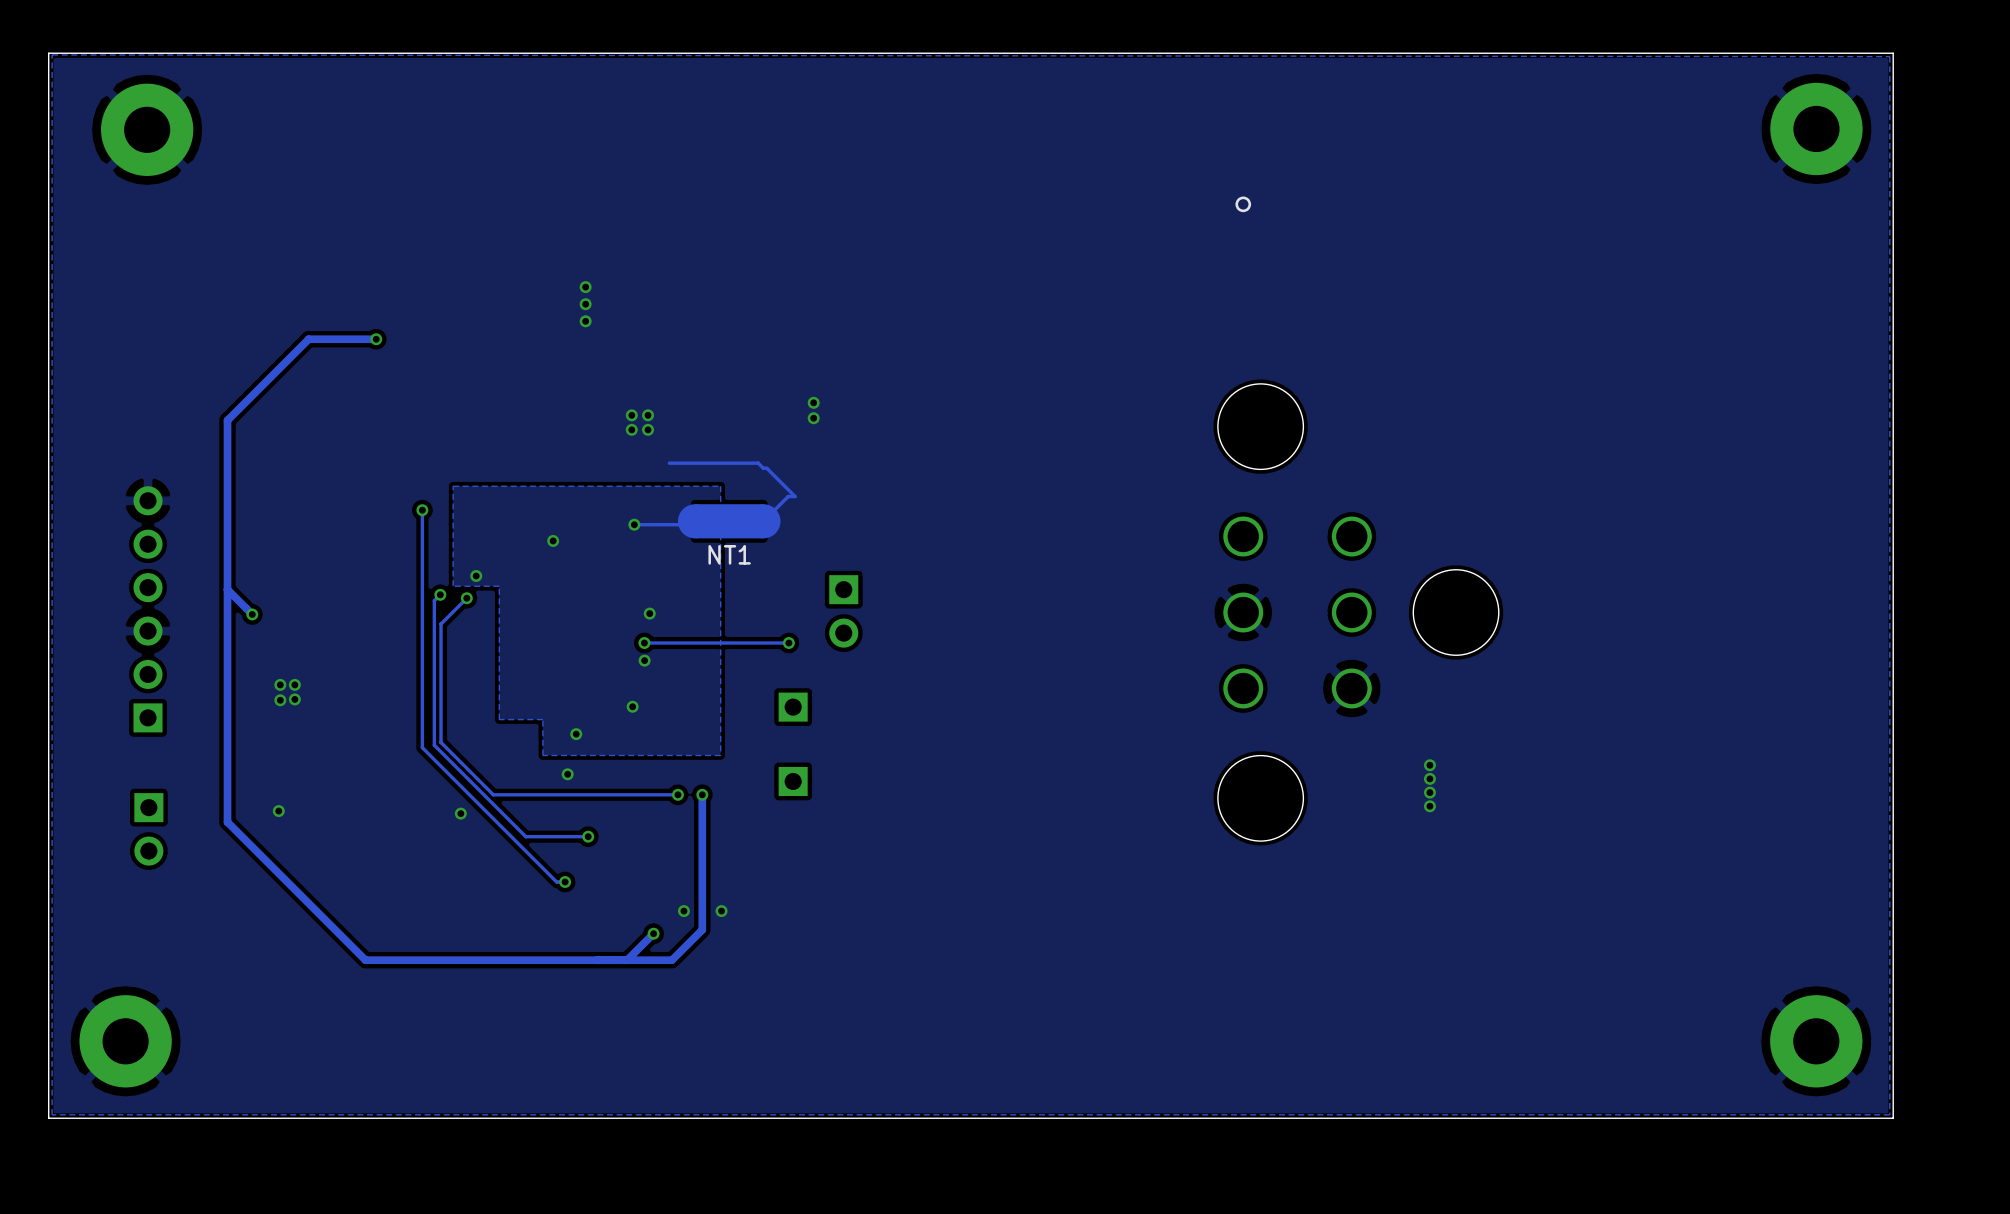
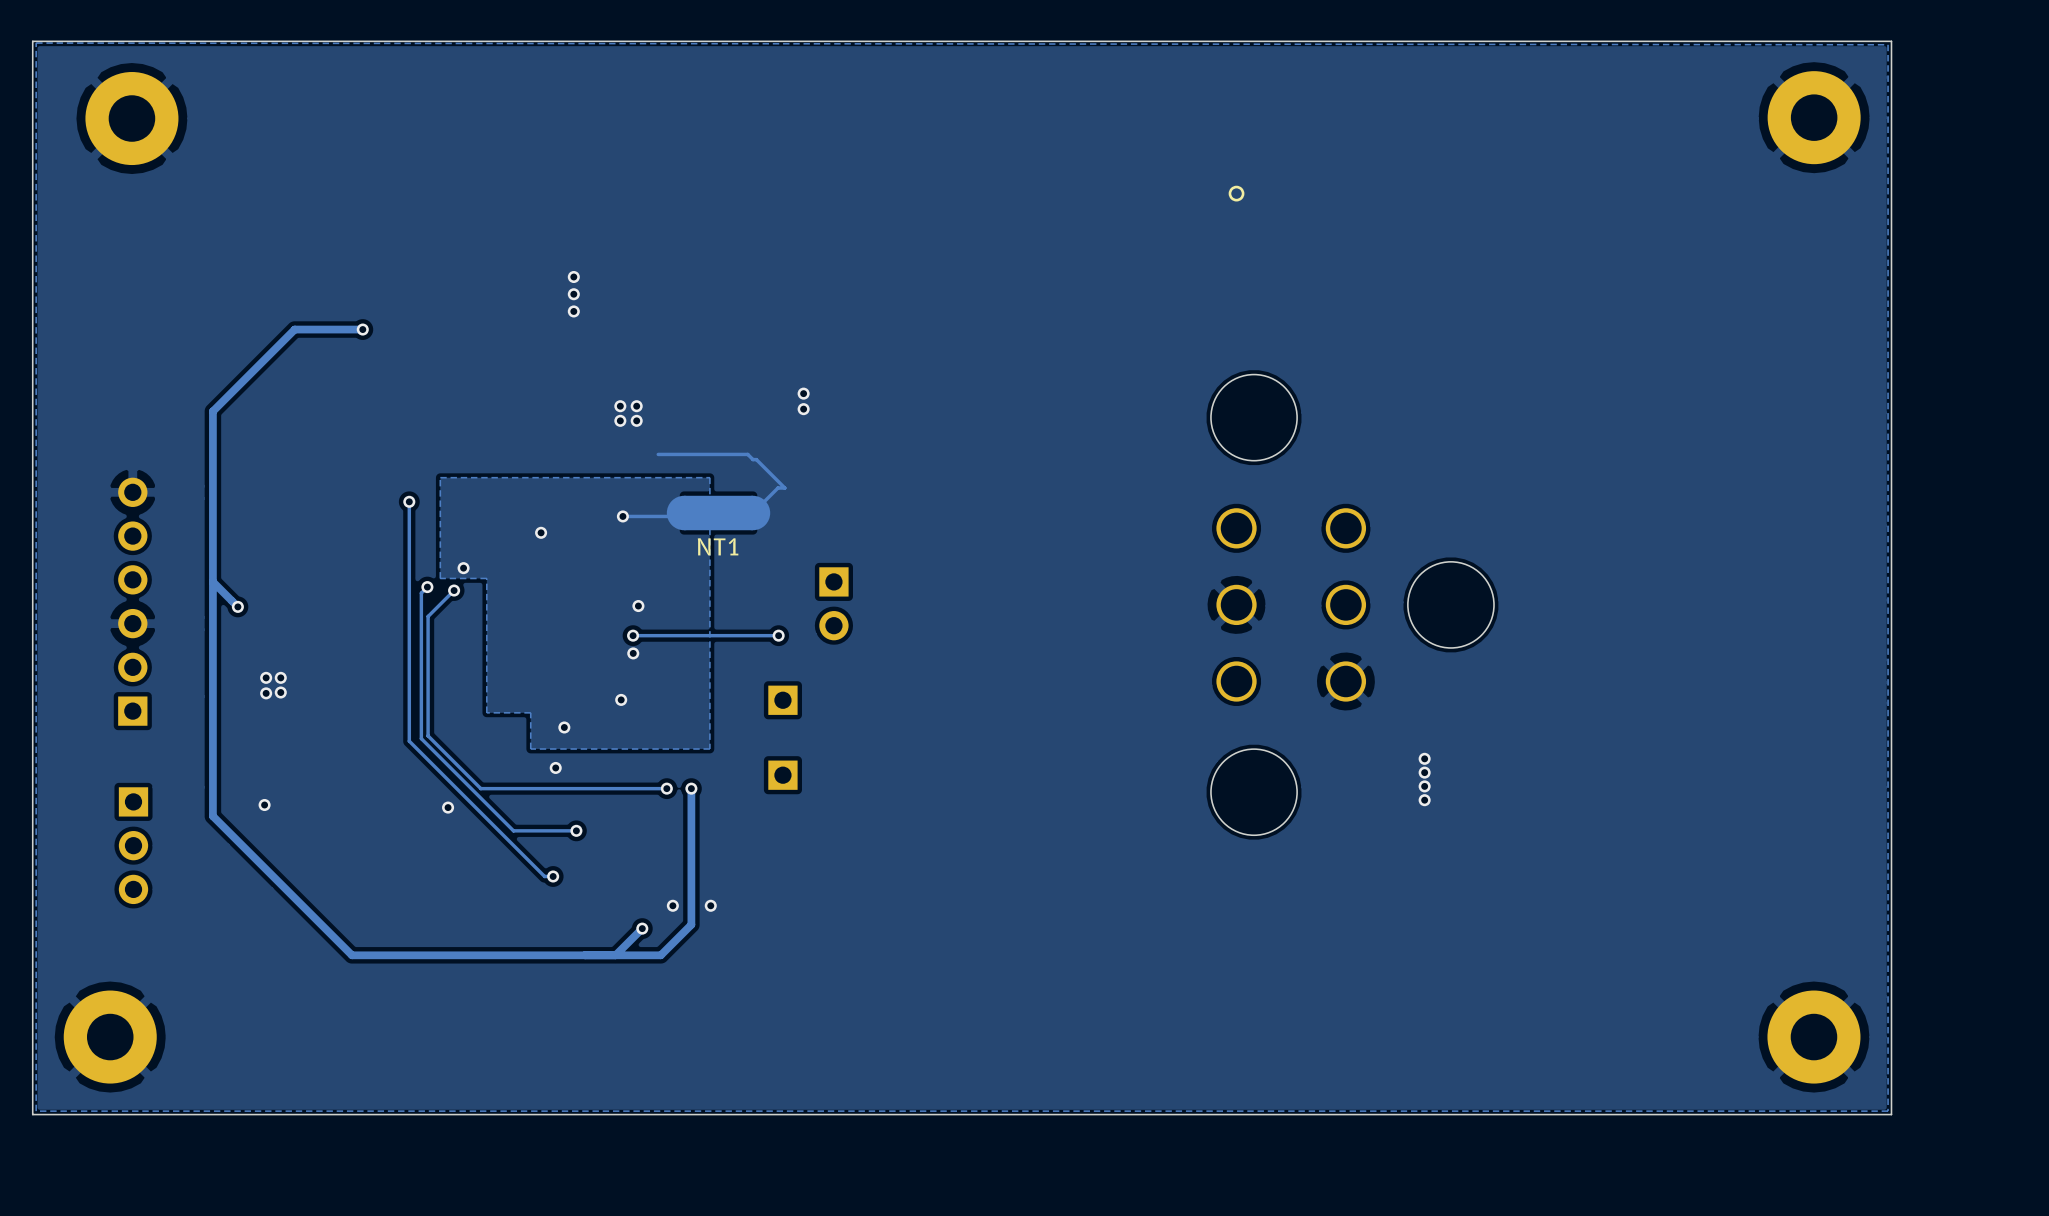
part: (148, 829) -> none
part: none -> (133, 845)

